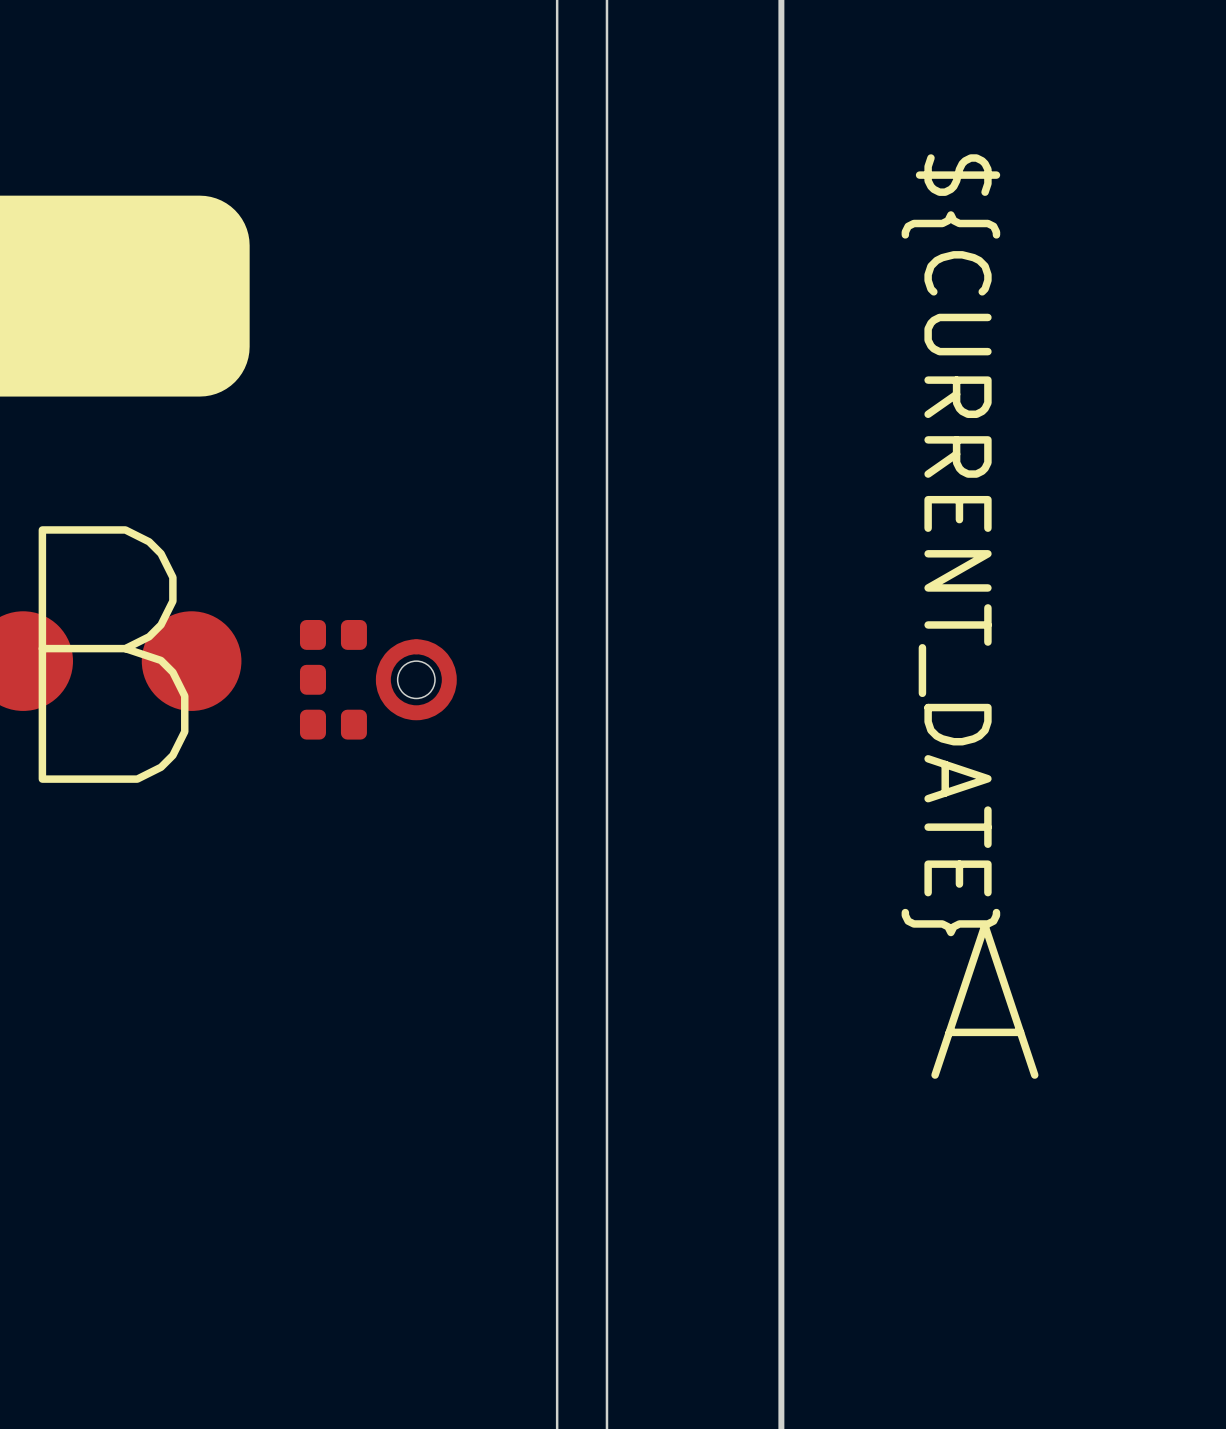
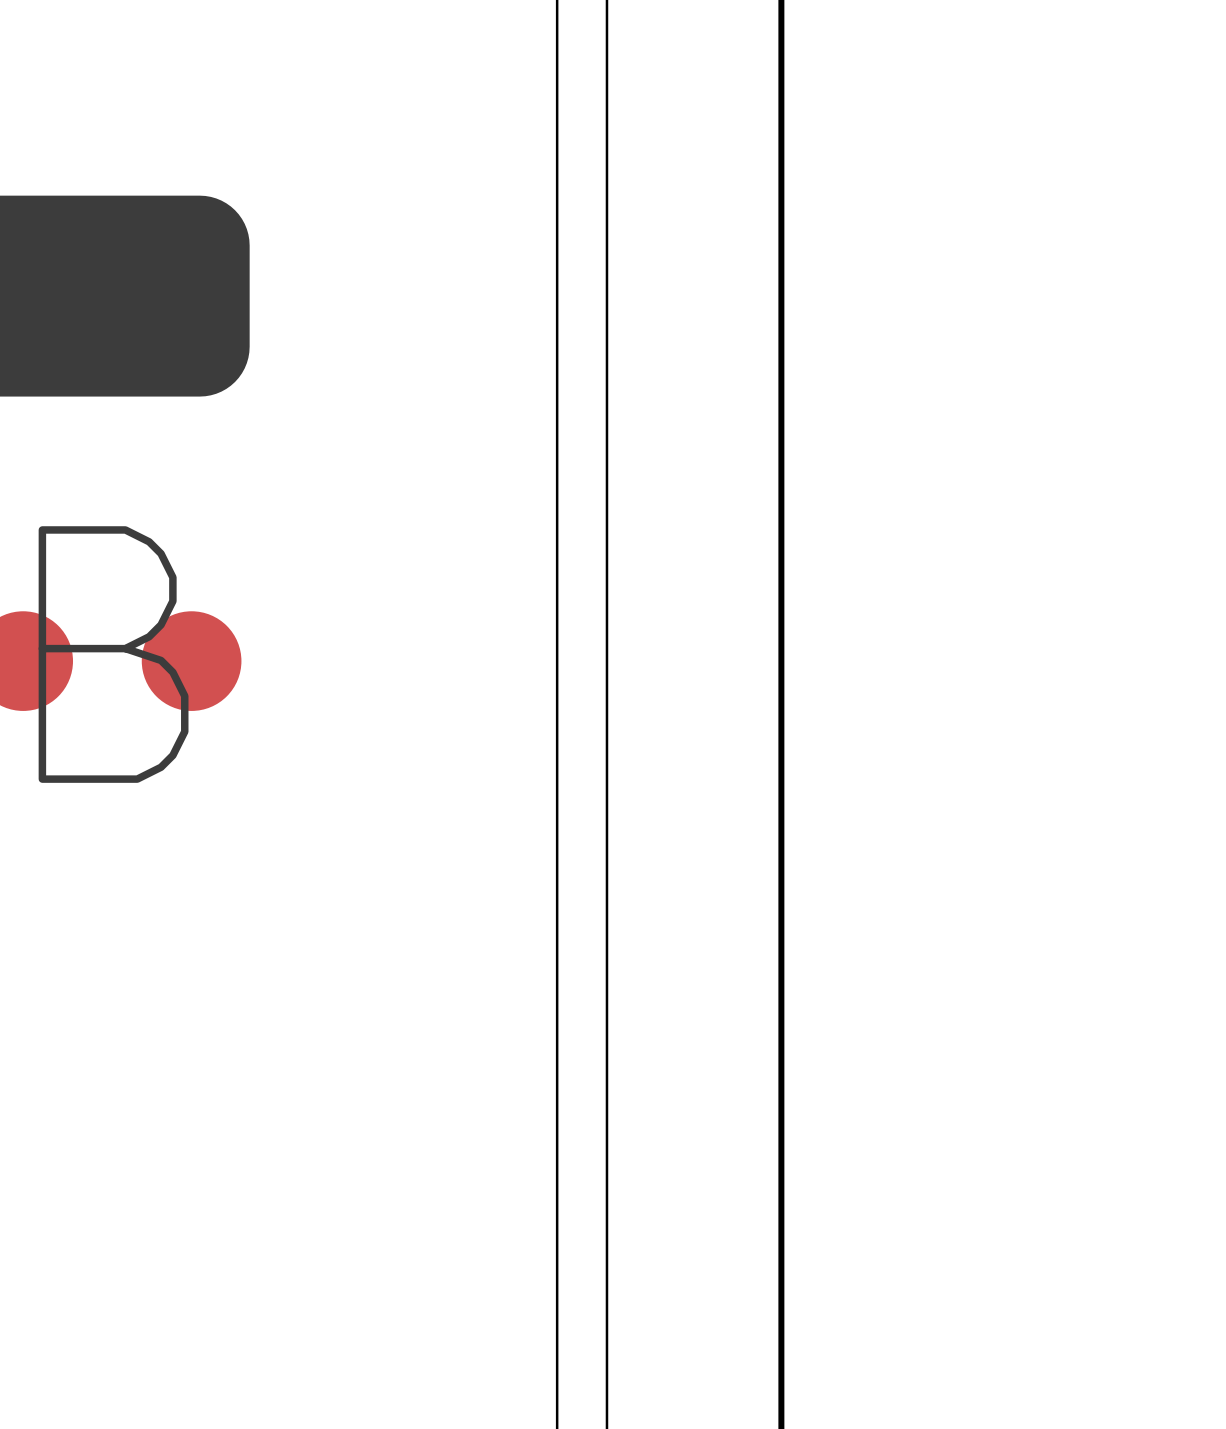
text: ${CURRENT_DATE} (950, 545) -> none
part: (378, 679) -> none
text: A (984, 1000) -> none

